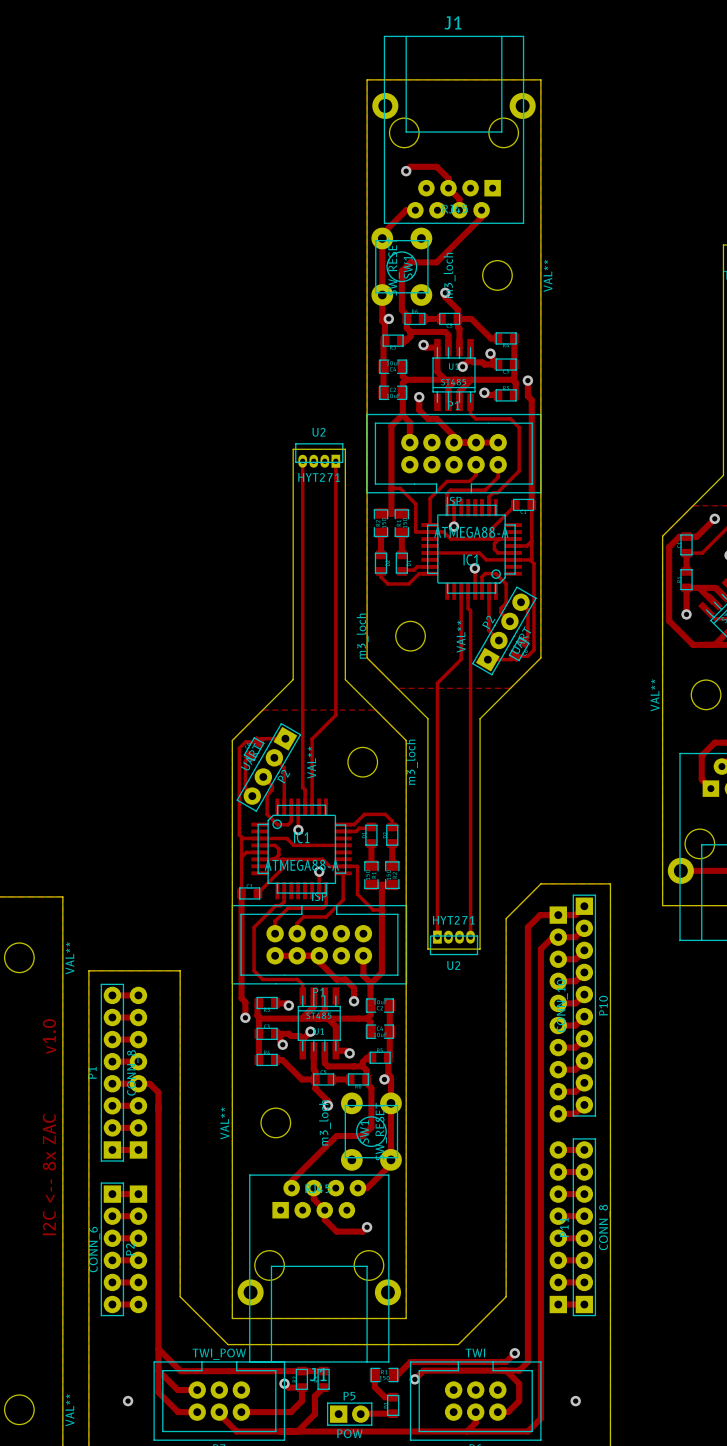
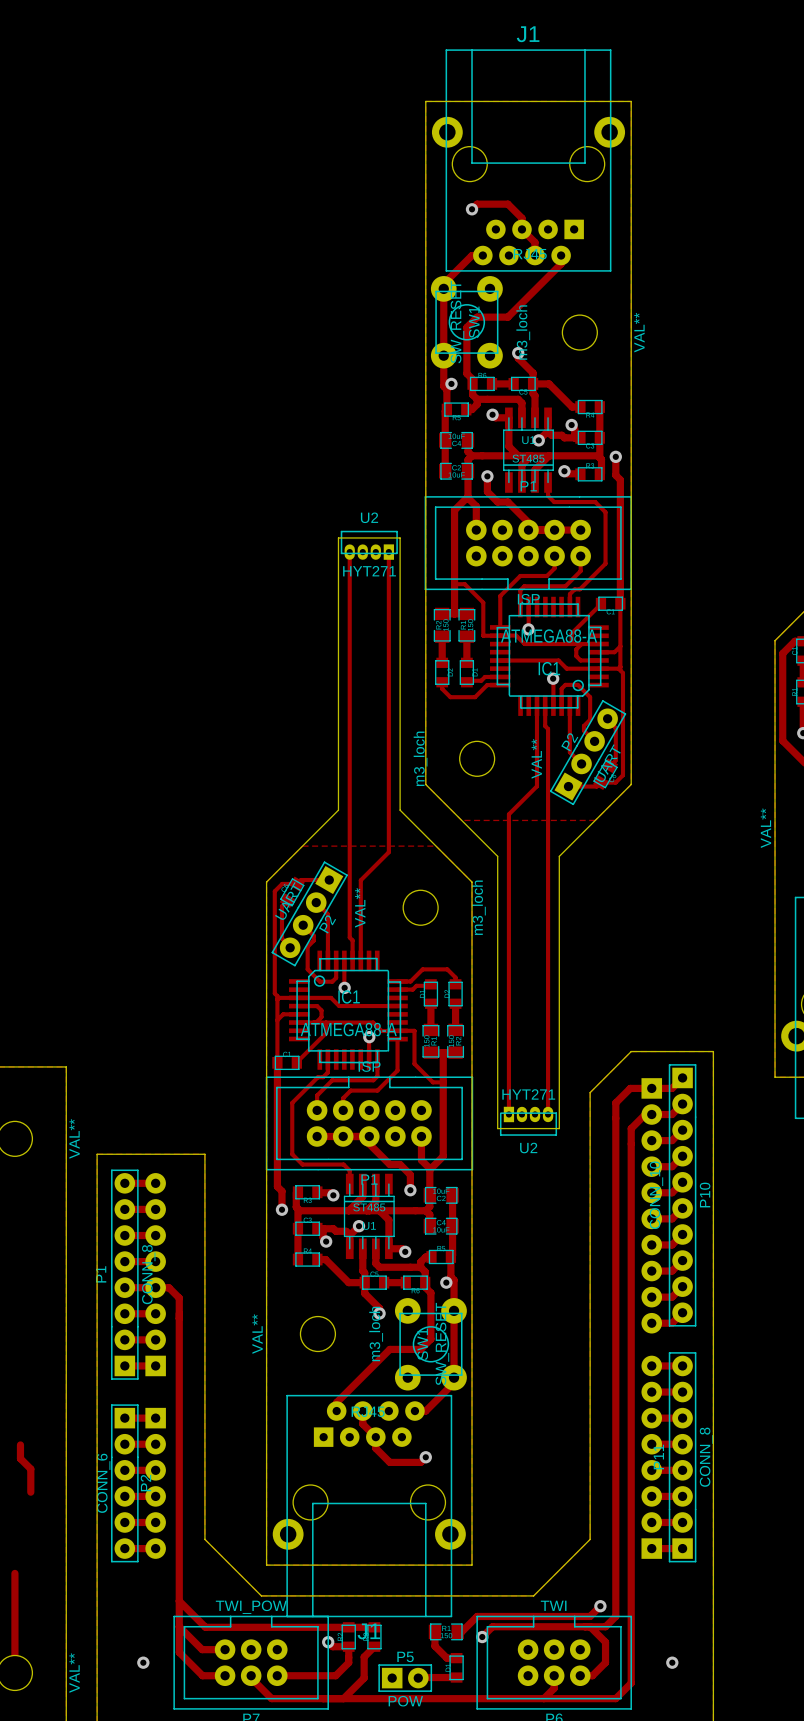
text: v1.0 (49, 1036) -> none
text: I2C <-- 8x ZAC (49, 1174) -> none
track: none -> (20, 1444) (20, 1458) (30, 1469) (30, 1492)
track: none -> (14, 1573) (14, 1662)

